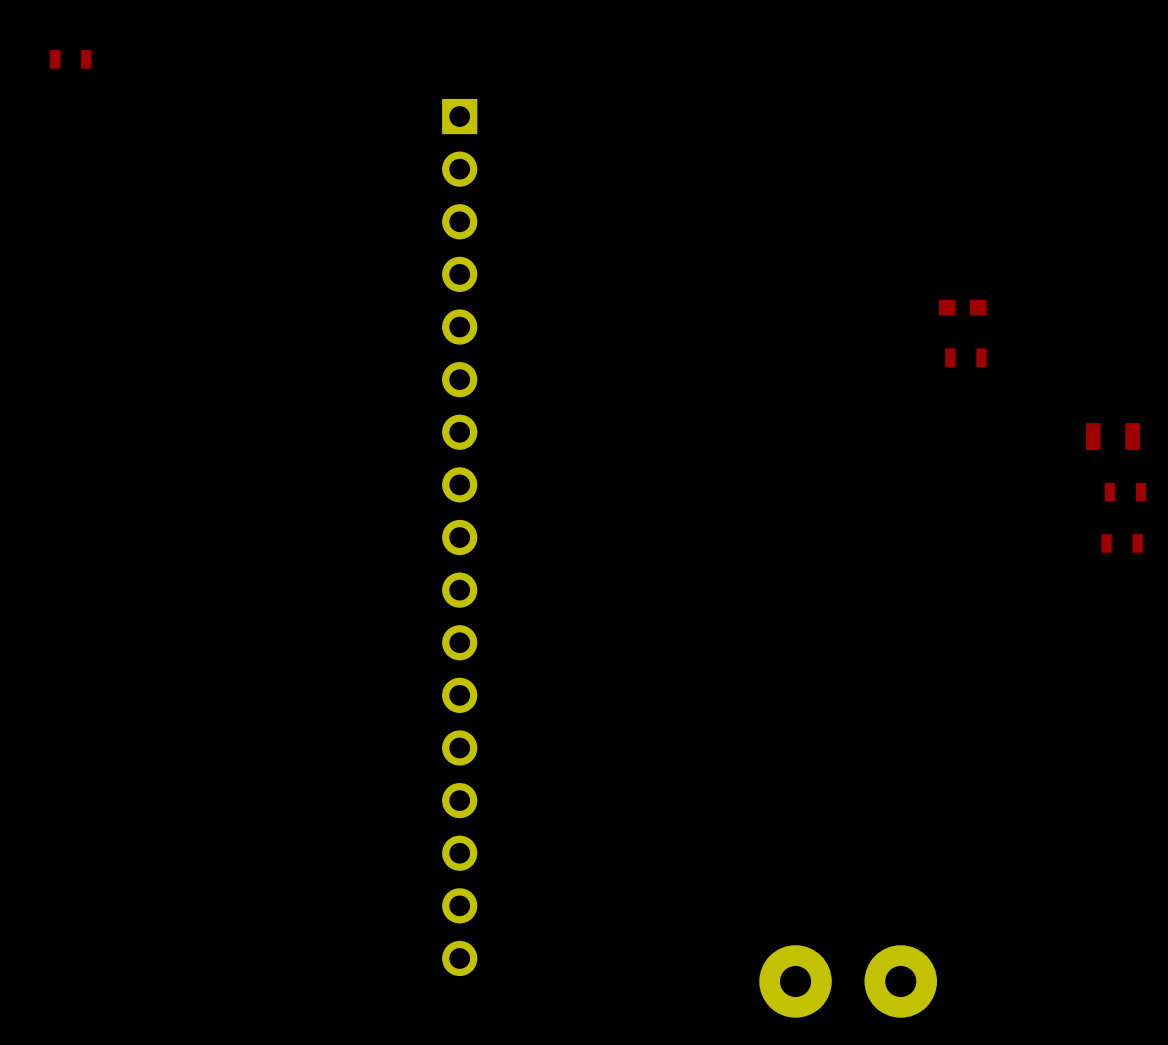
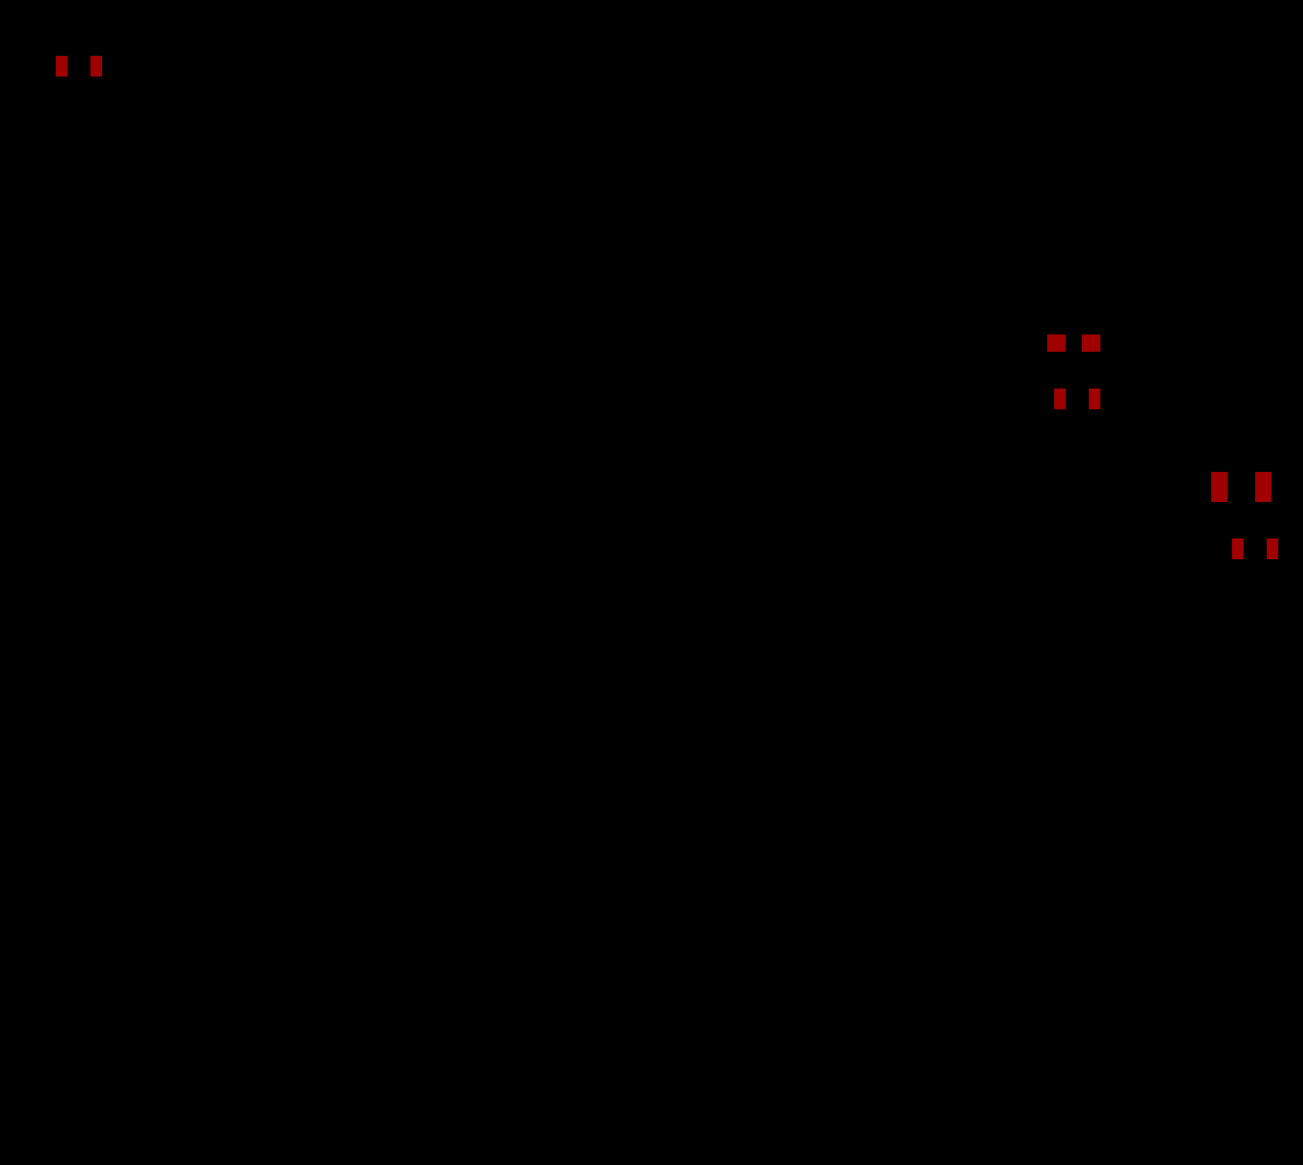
part: (459, 537) -> none
part: (1122, 543) -> none
part: (848, 981) -> none

